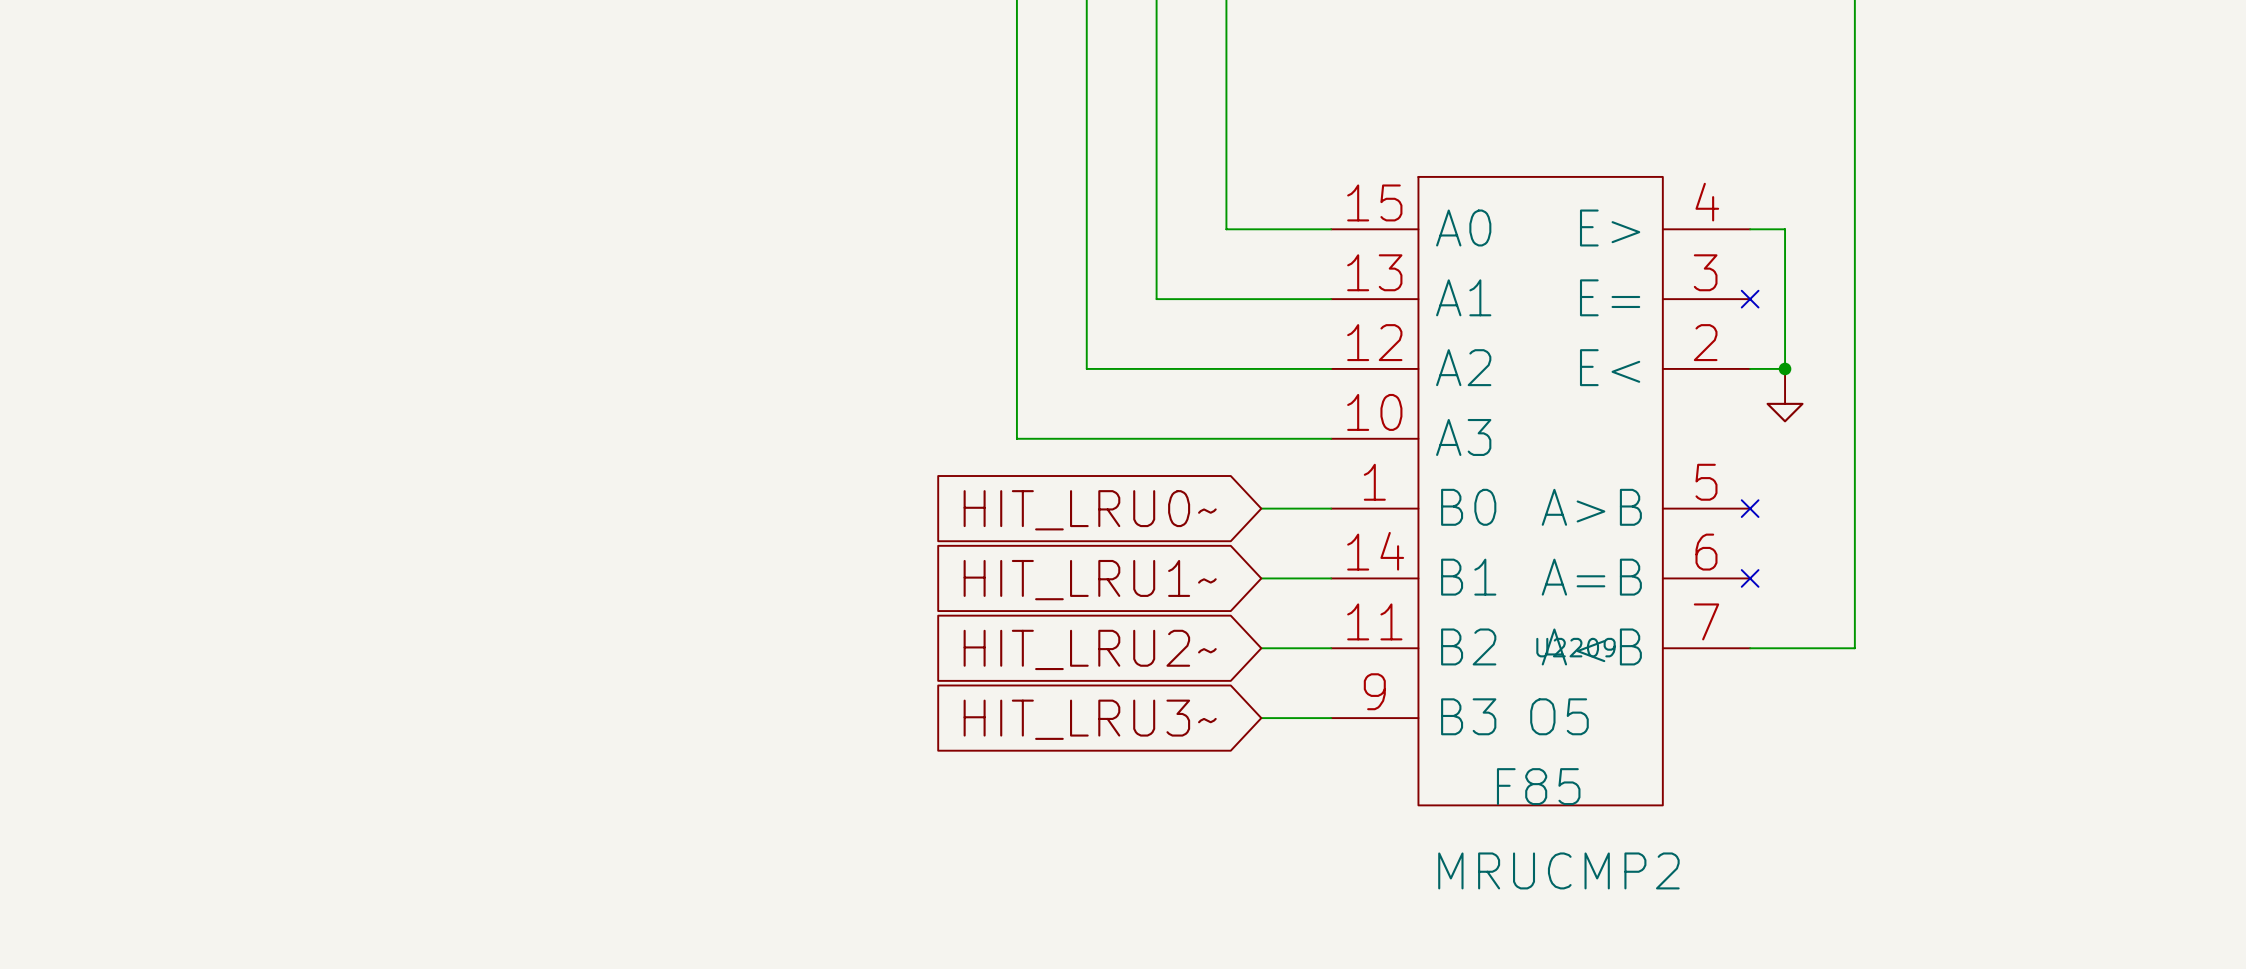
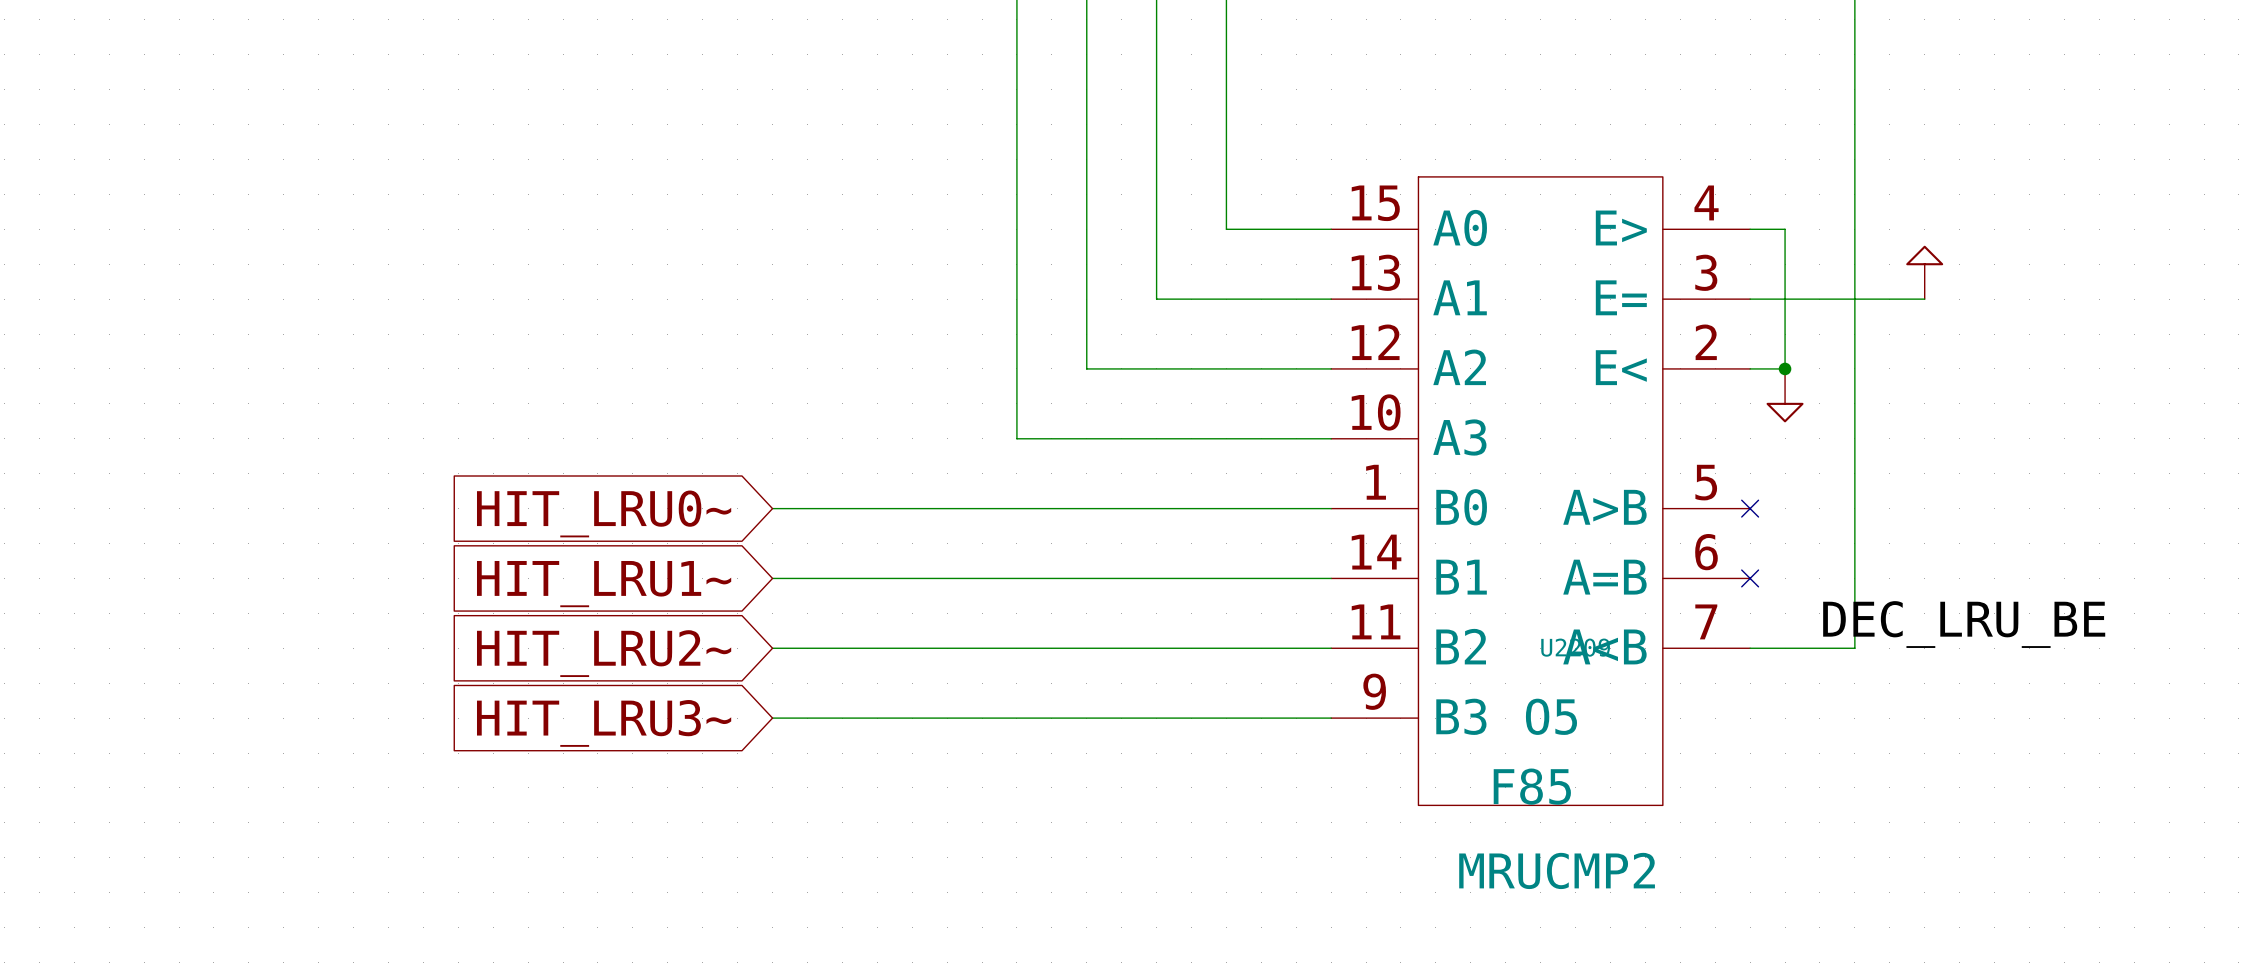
power symbol: none -> (1924, 272)
wire: none -> (1750, 299) (1924, 299)
no-connect mark: (1750, 299) -> none
wire: none -> (772, 508) (1261, 508)
global label: none -> HIT_LRU0~ (604, 513)
global label: HIT_LRU0~ (1090, 510) -> none
wire: none -> (772, 578) (1261, 578)
global label: none -> HIT_LRU1~ (604, 584)
global label: HIT_LRU1~ (1090, 580) -> none
label: none -> DEC_LRU_BE (1964, 624)
wire: none -> (772, 648) (1261, 648)
global label: none -> HIT_LRU2~ (604, 653)
global label: HIT_LRU2~ (1090, 649) -> none
wire: none -> (772, 718) (1261, 718)
global label: none -> HIT_LRU3~ (604, 723)
global label: HIT_LRU3~ (1090, 719) -> none

